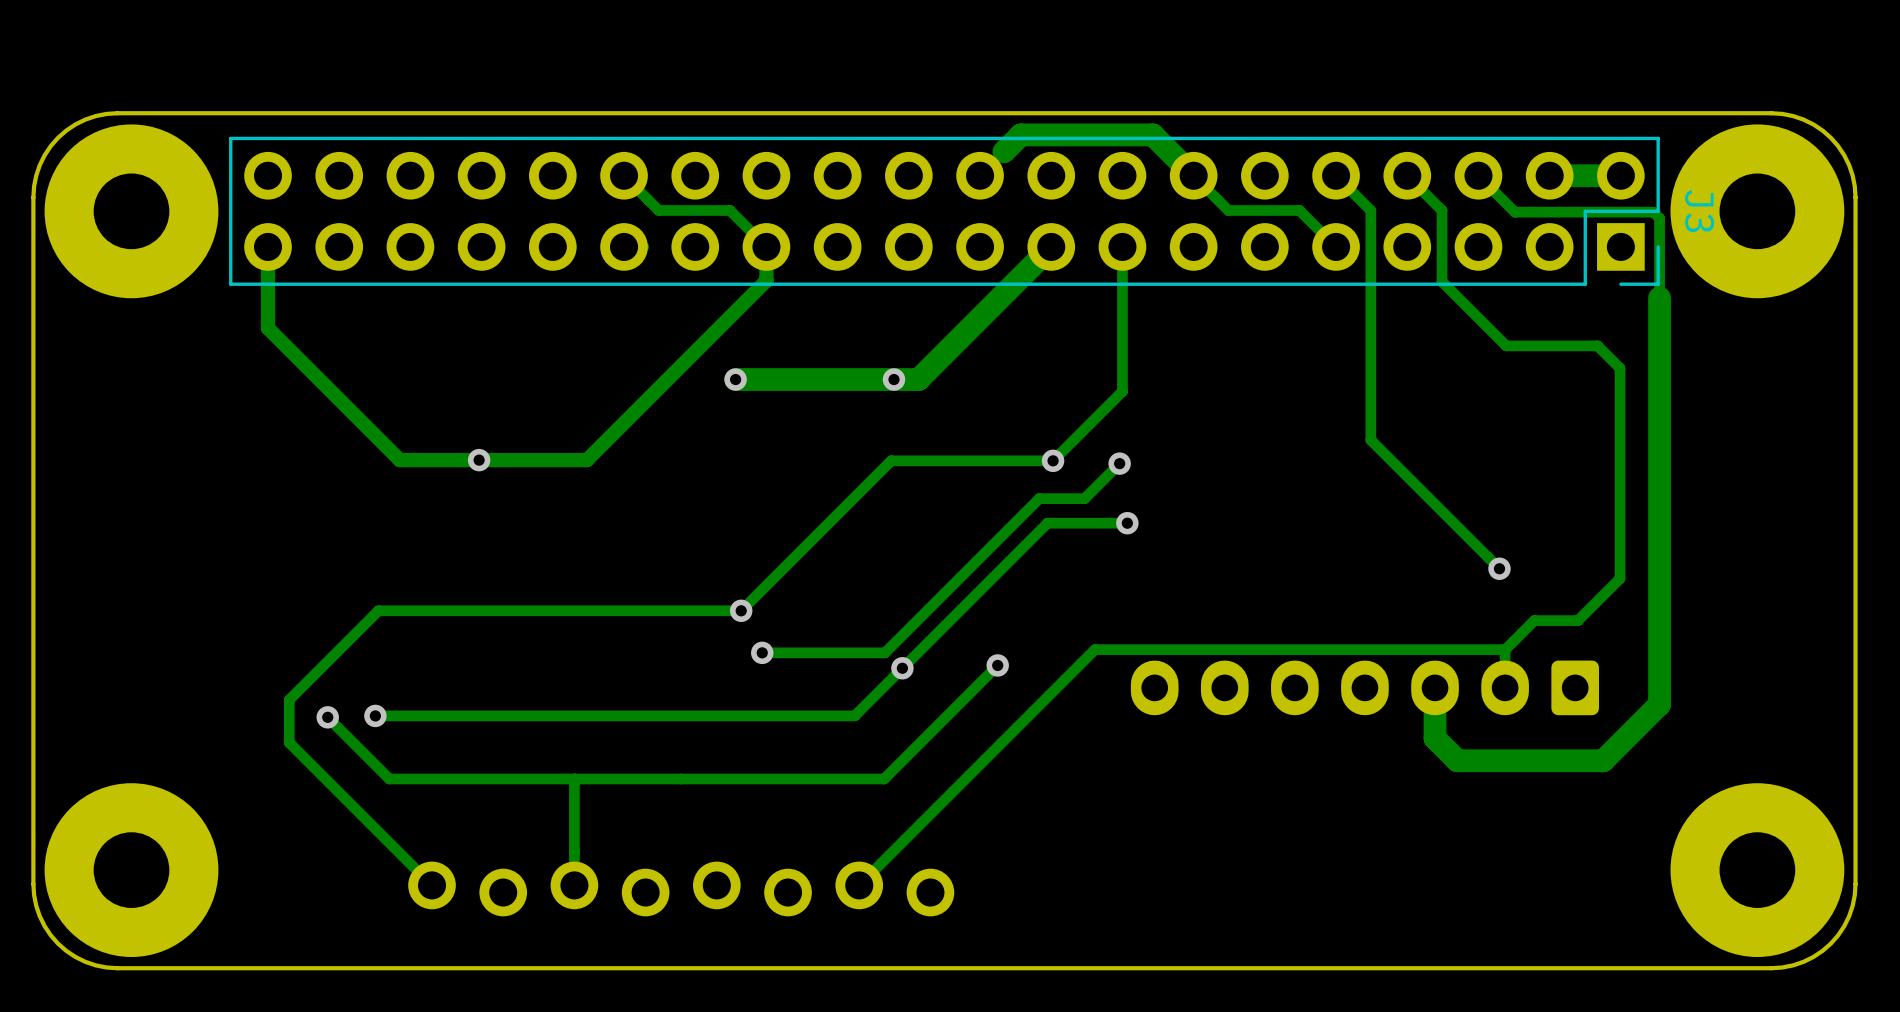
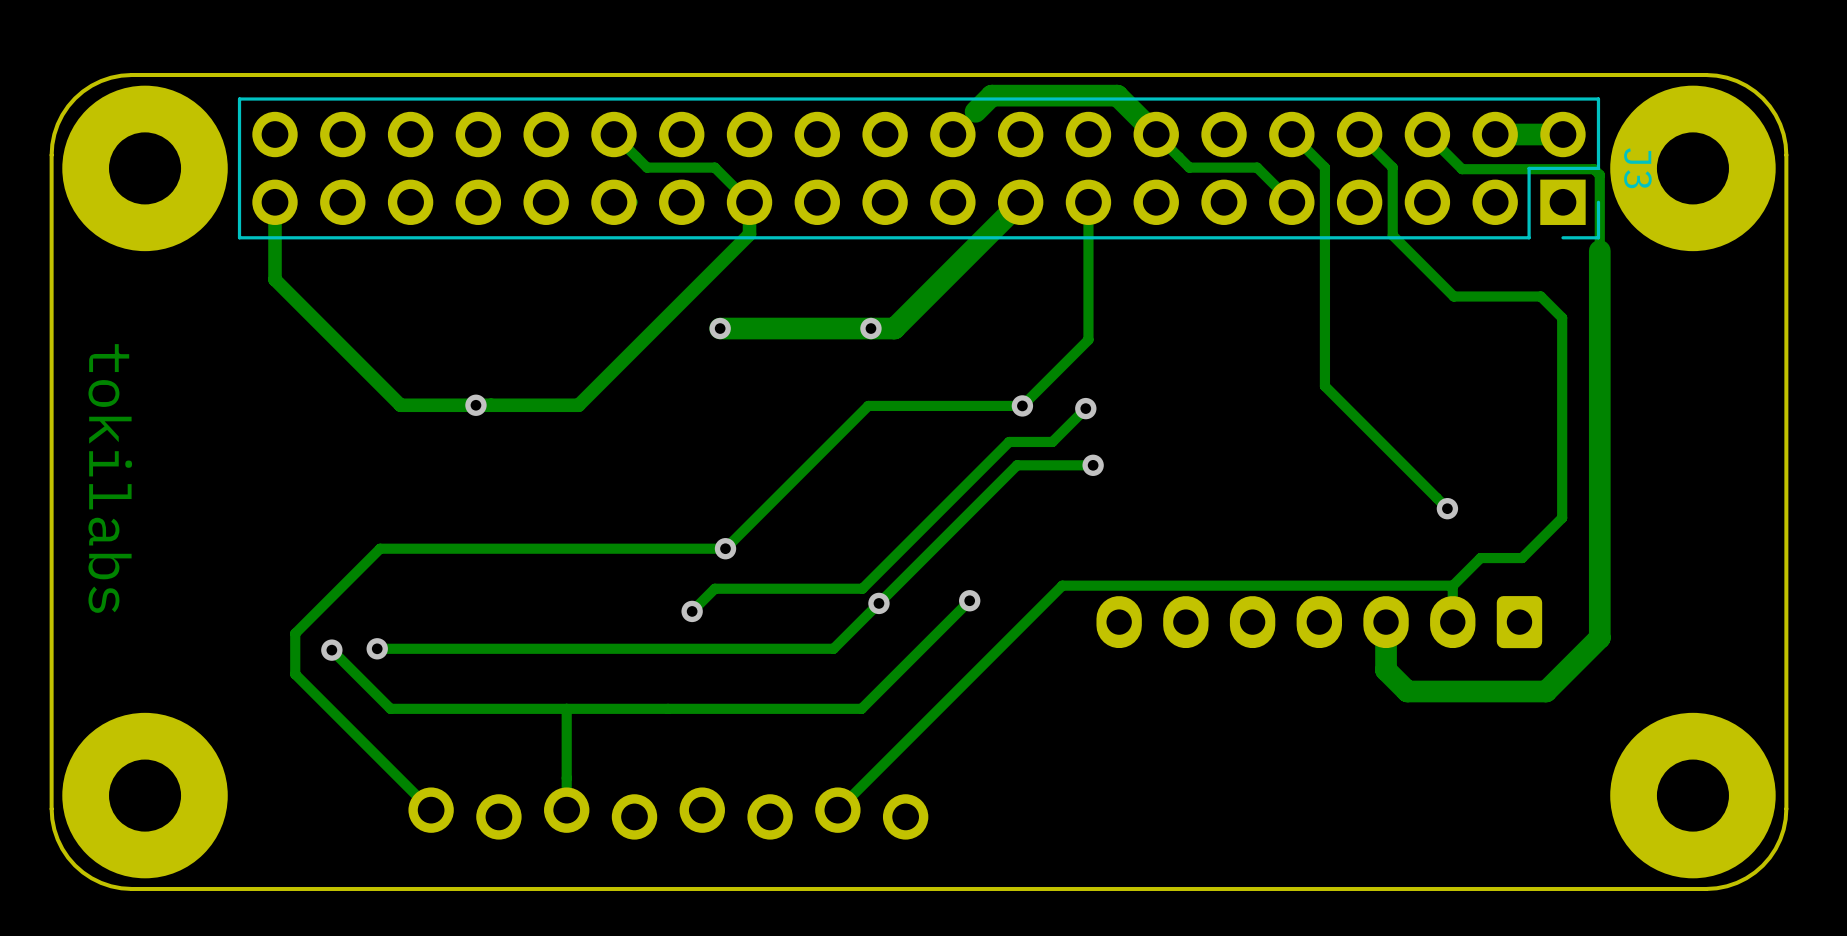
text: none -> tokilabs (110, 478)
track: none -> (745, 588) (714, 588) (692, 611)
via position: (762, 652) -> (692, 611)

